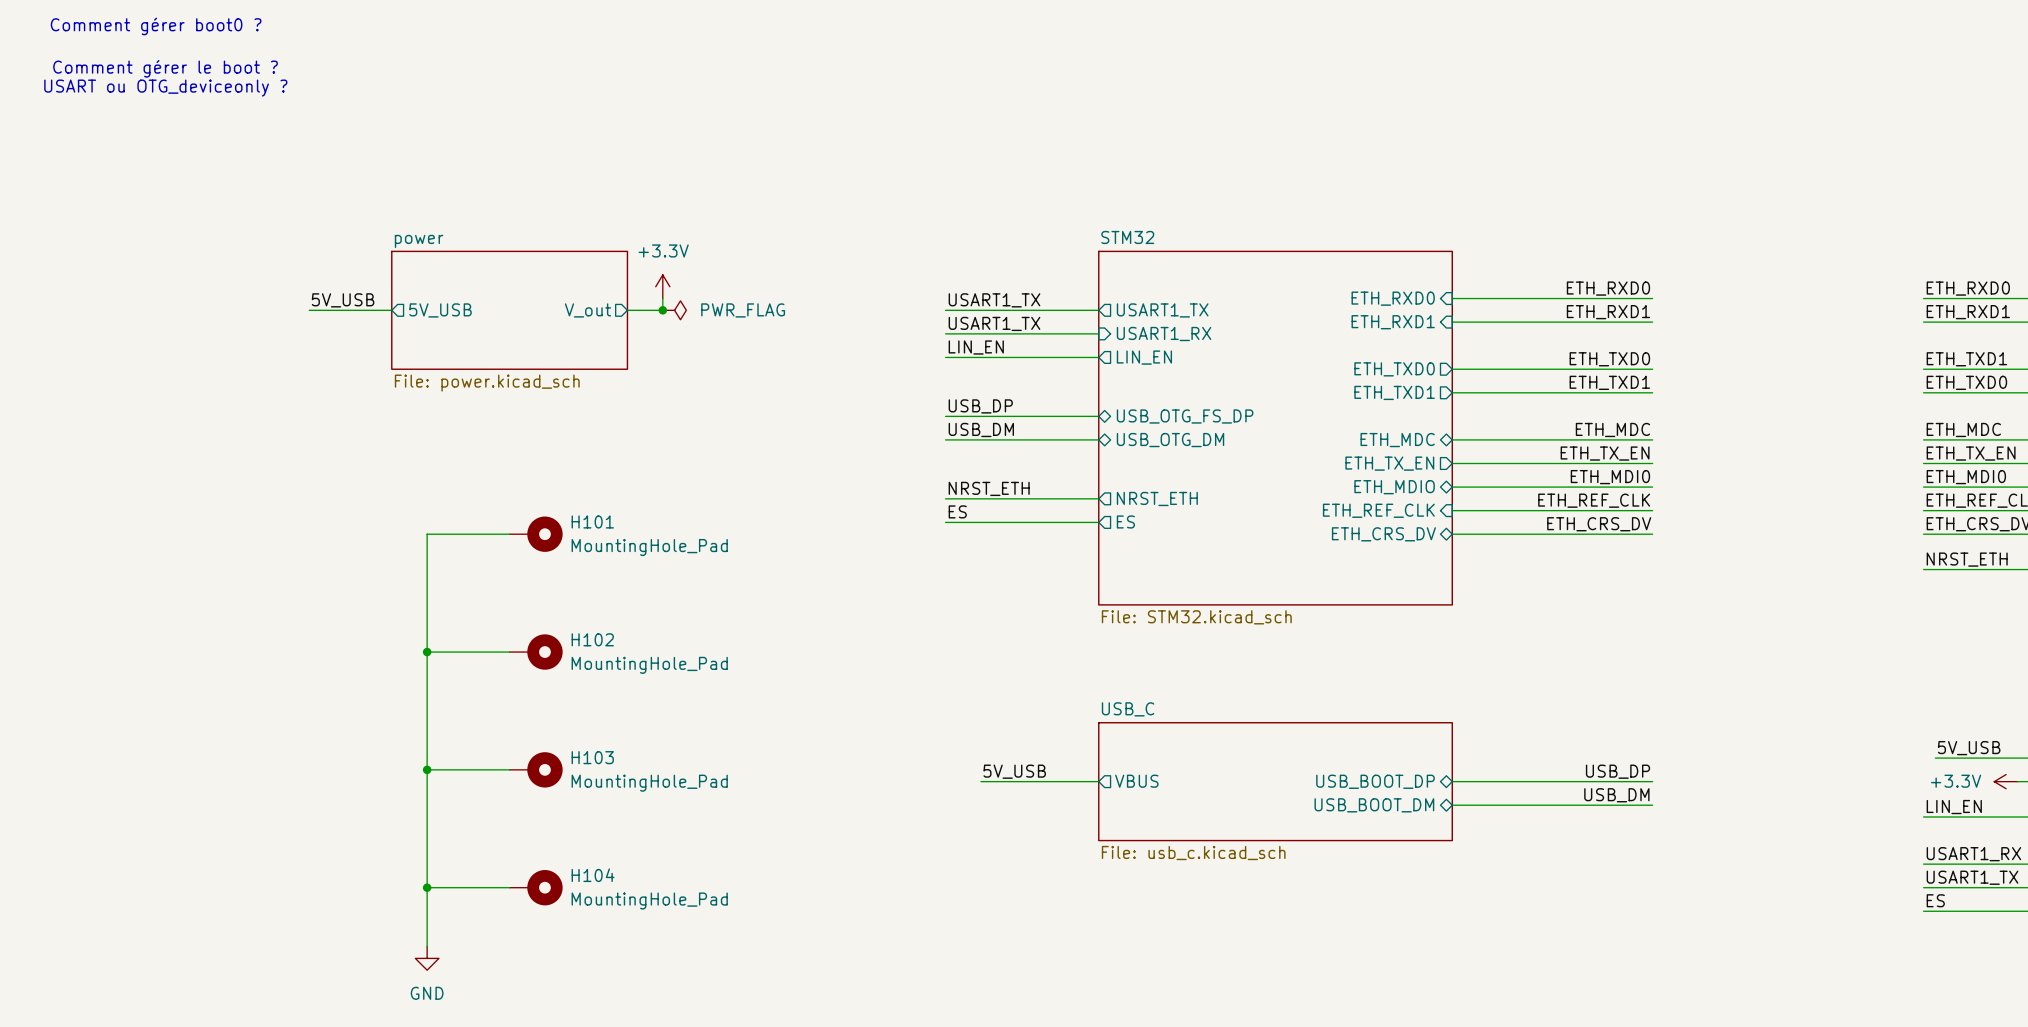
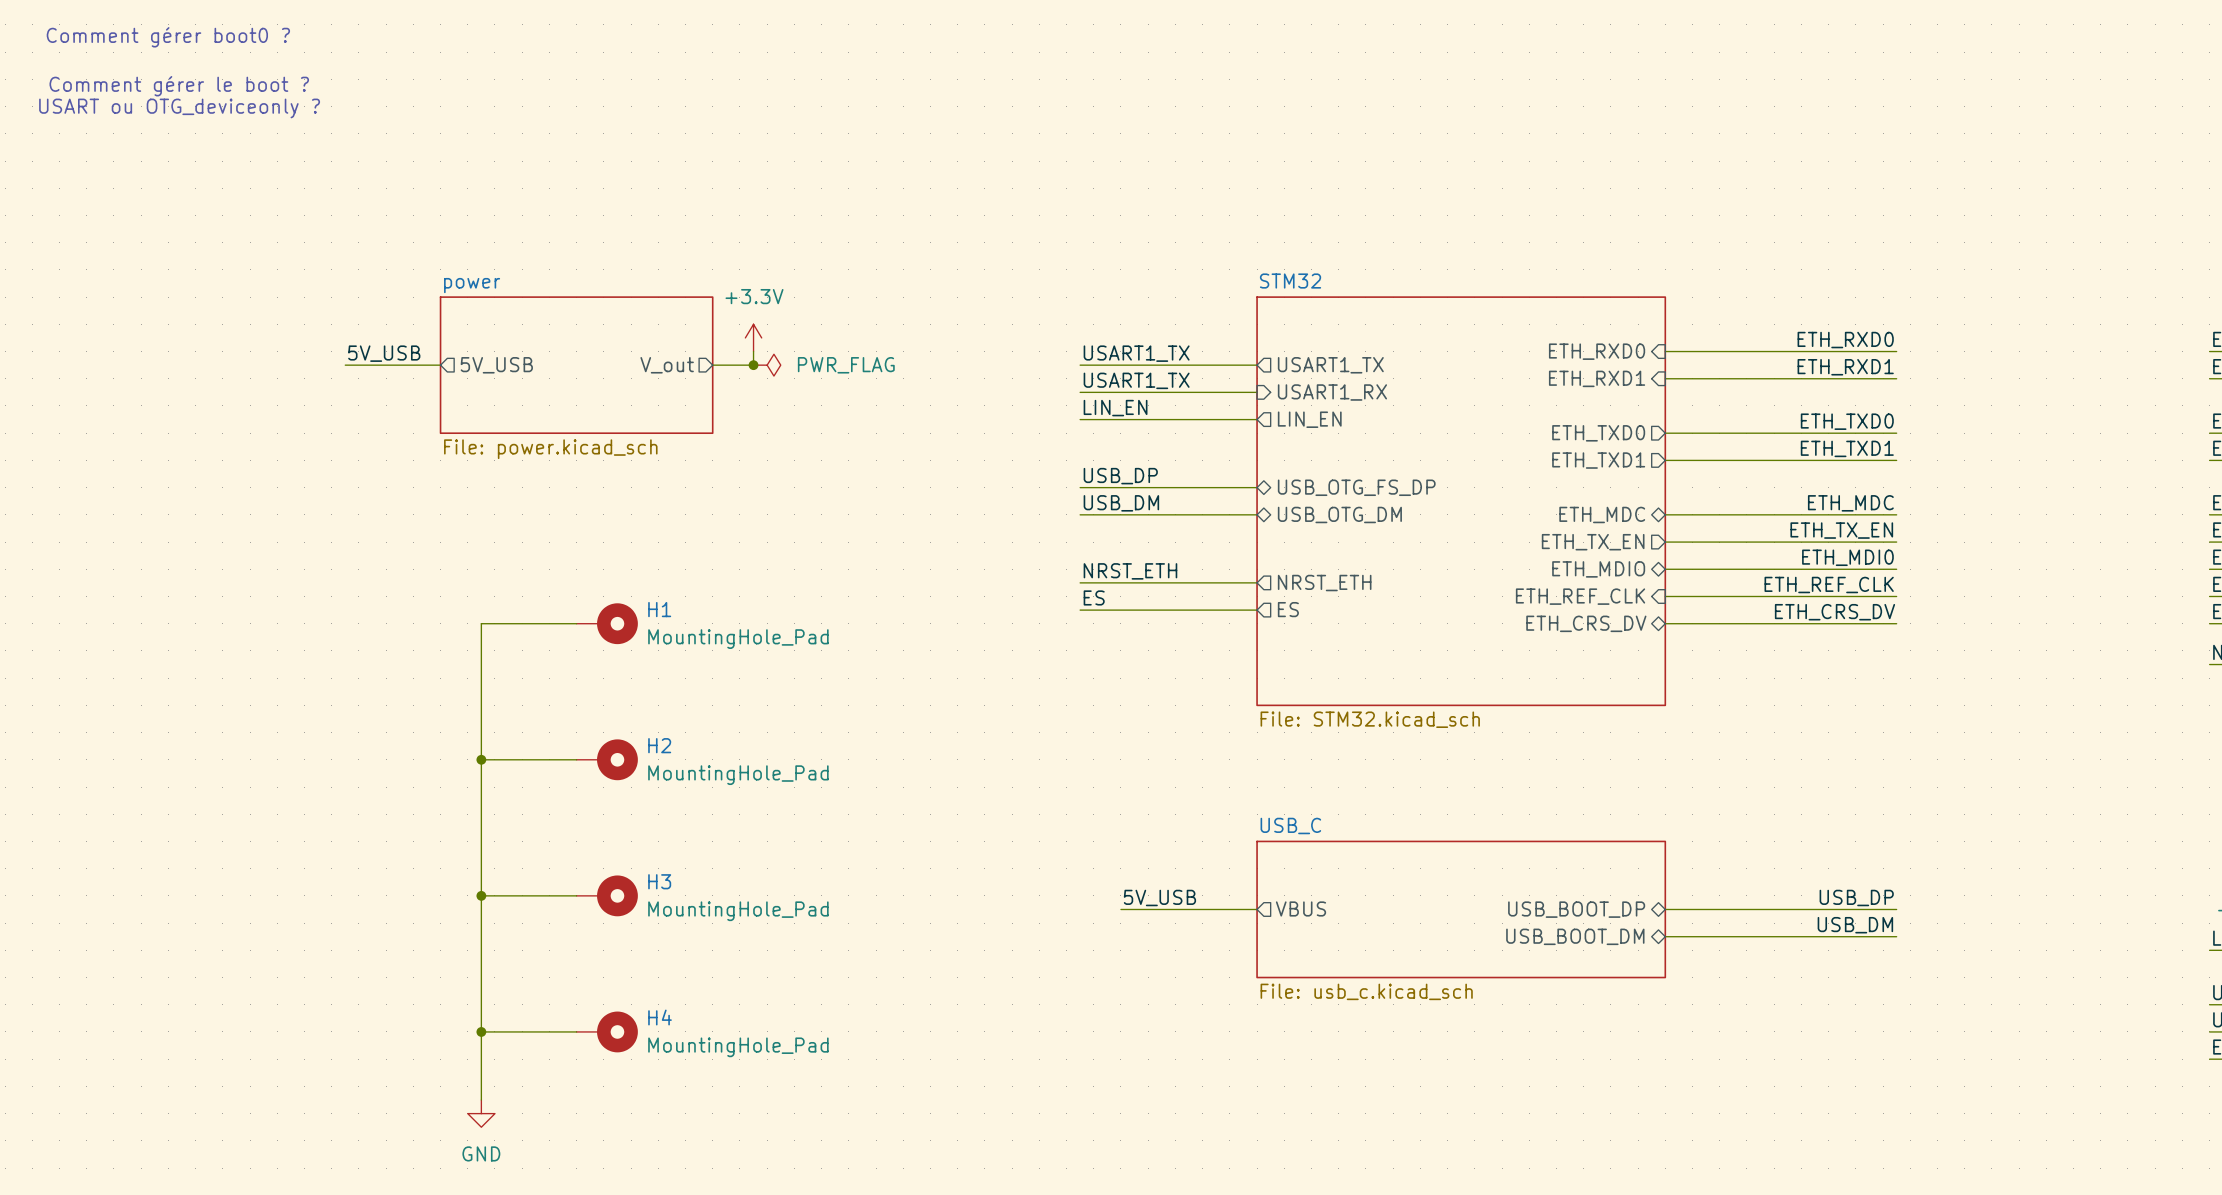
H101 name: H101 (592, 521) -> H1 (659, 609)
H102 name: H102 (592, 639) -> H2 (659, 745)
H103 name: H103 (592, 757) -> H3 (659, 881)
H104 name: H104 (593, 875) -> H4 (660, 1017)

